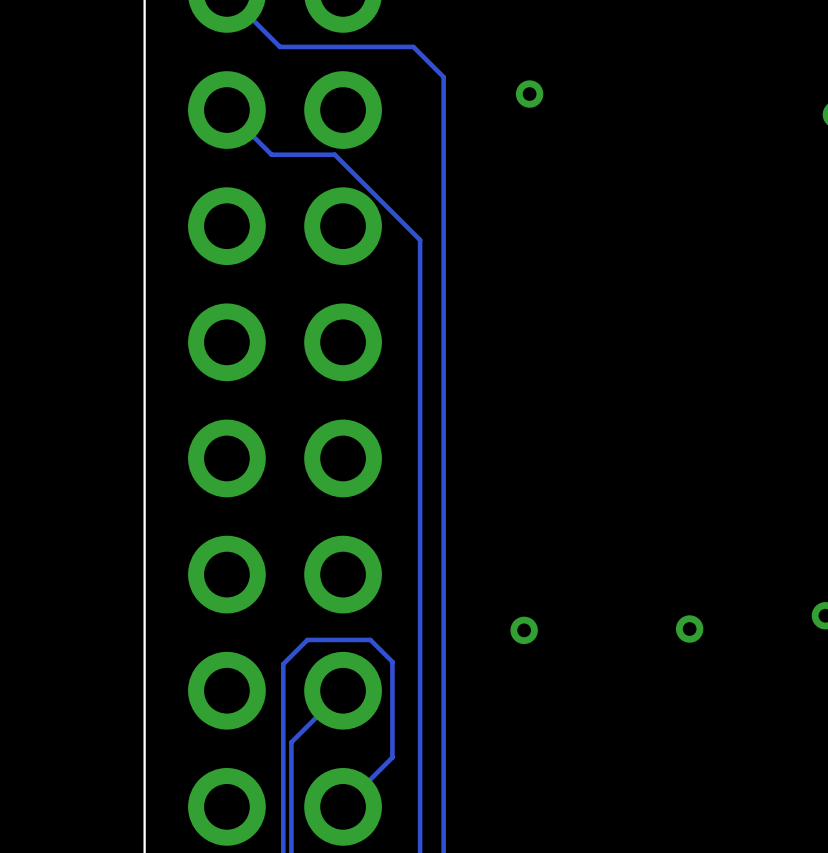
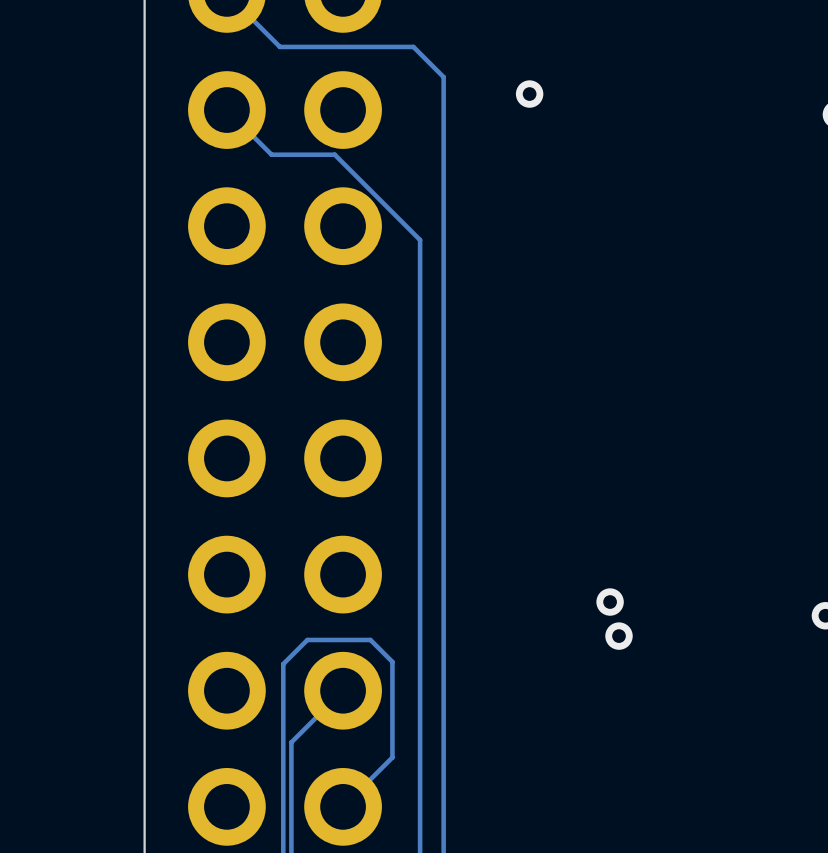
via: none -> (610, 602)
via: (689, 629) -> none
via: (524, 630) -> none
via: none -> (619, 636)

